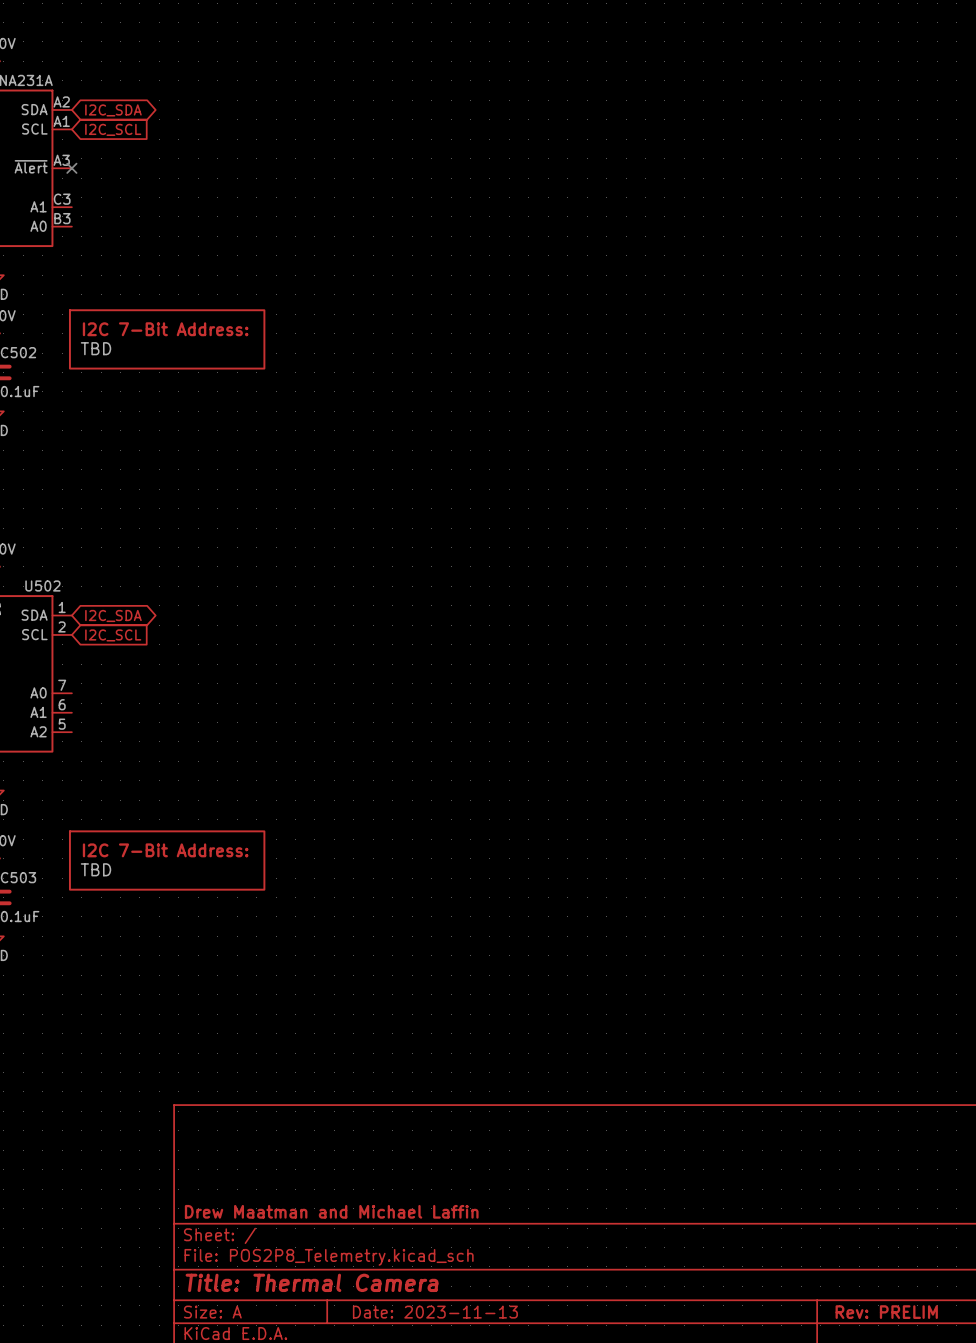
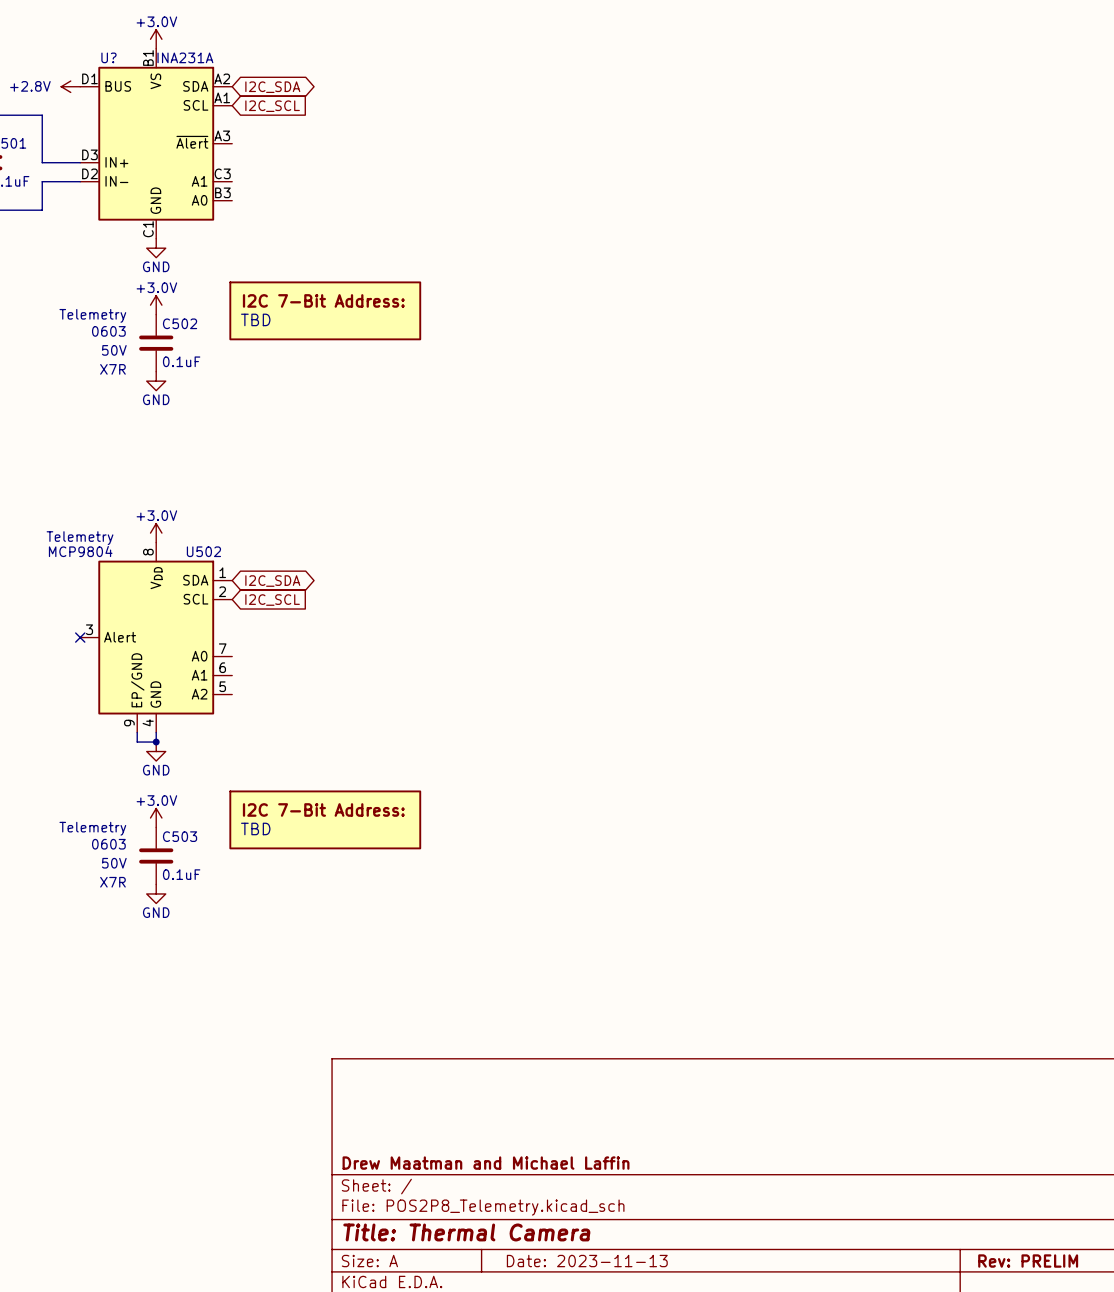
no-connect mark: (71, 168) -> none

